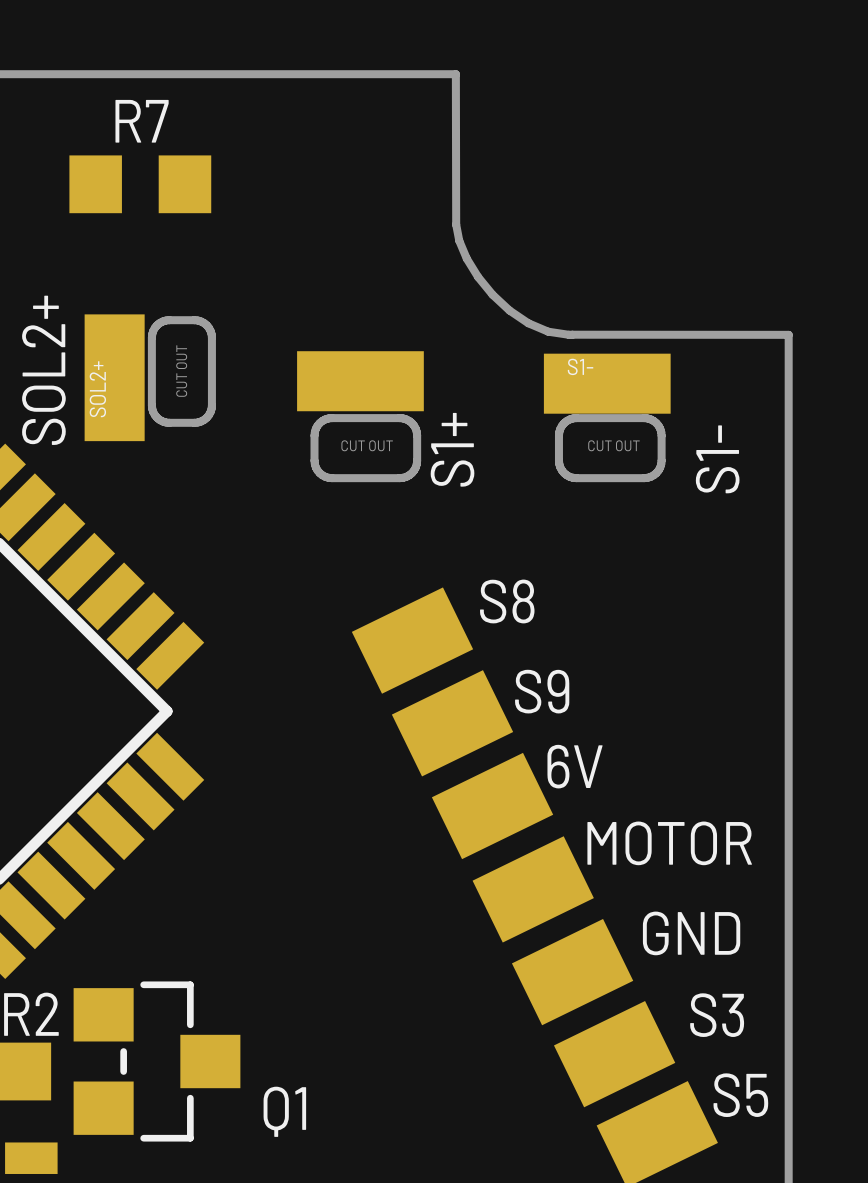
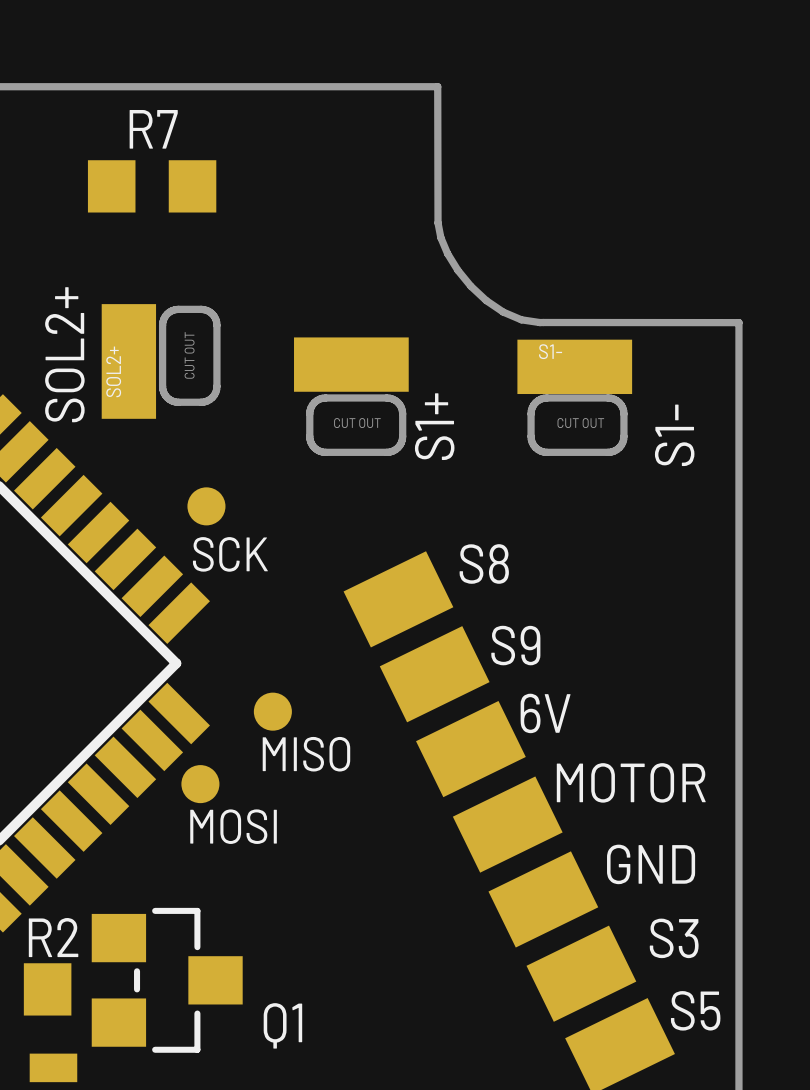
SCK: none -> (206, 506)
MISO: none -> (272, 711)
MOSI: none -> (200, 784)

